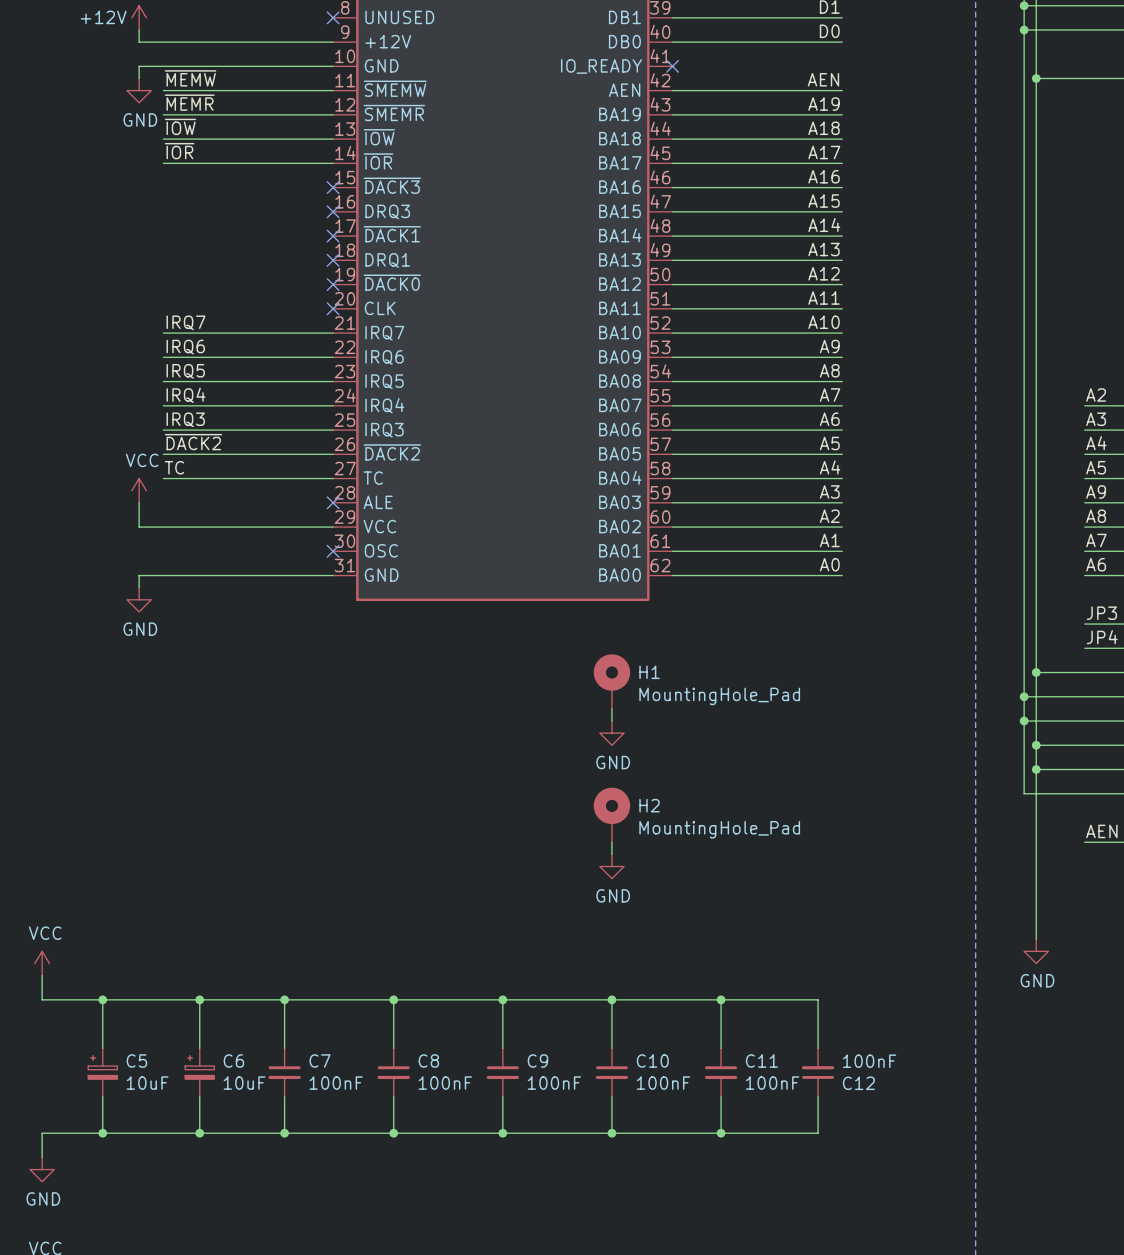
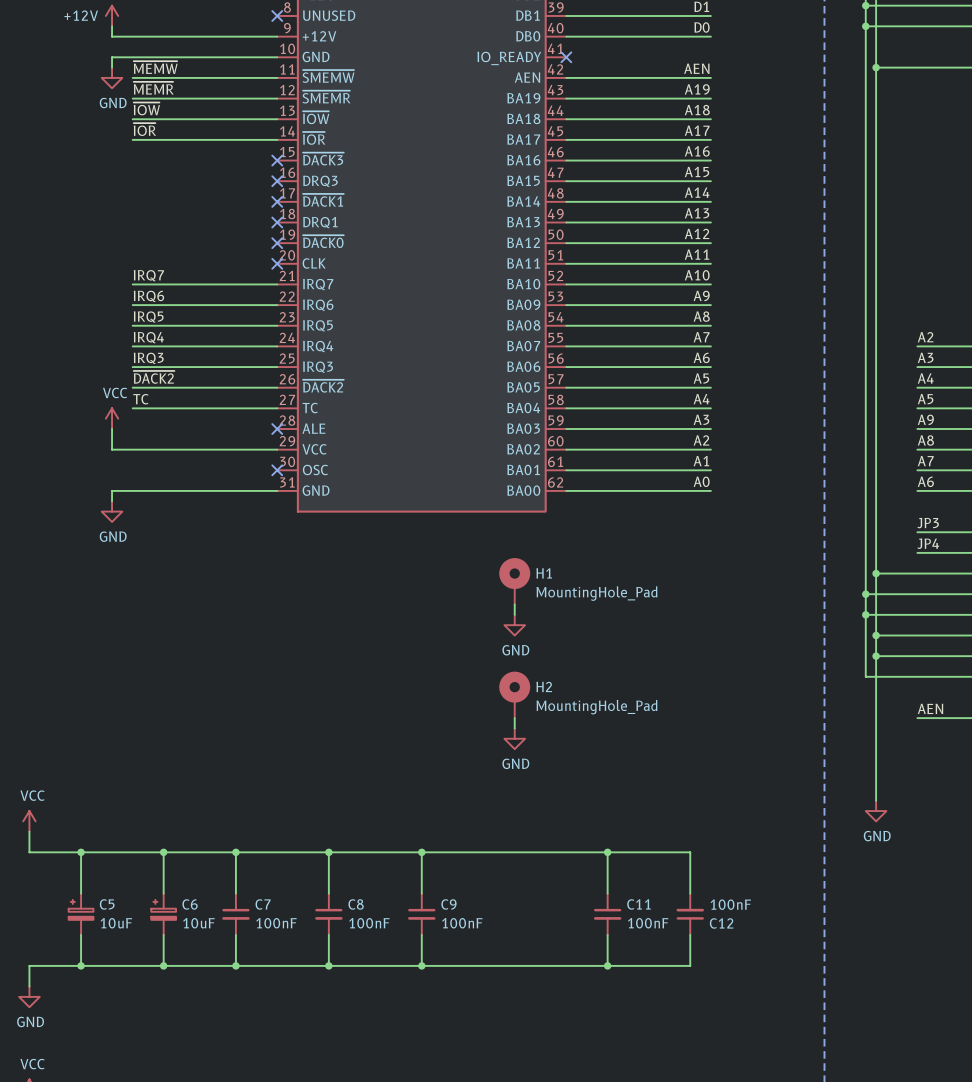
wire: (611, 999) (611, 1048) -> none
junction: (611, 999) -> none
C10: 100nF (611, 1072) -> none
wire: (611, 1096) (611, 1133) -> none
junction: (611, 1133) -> none

